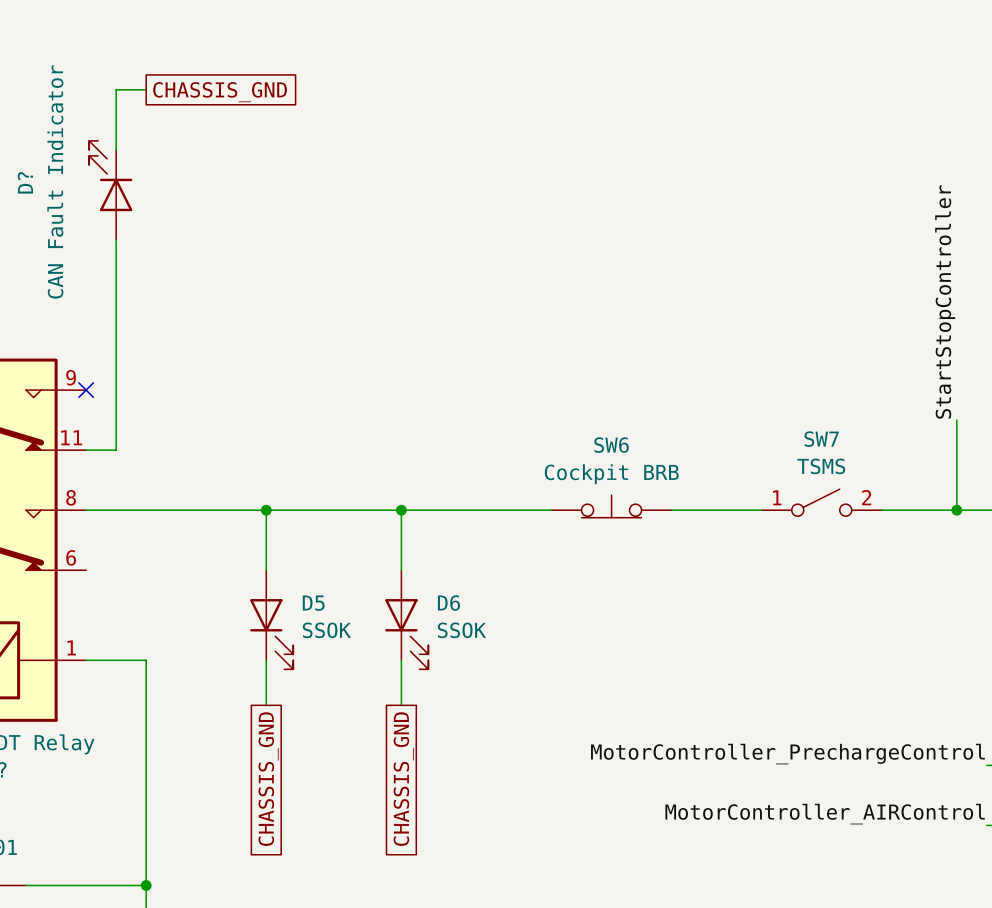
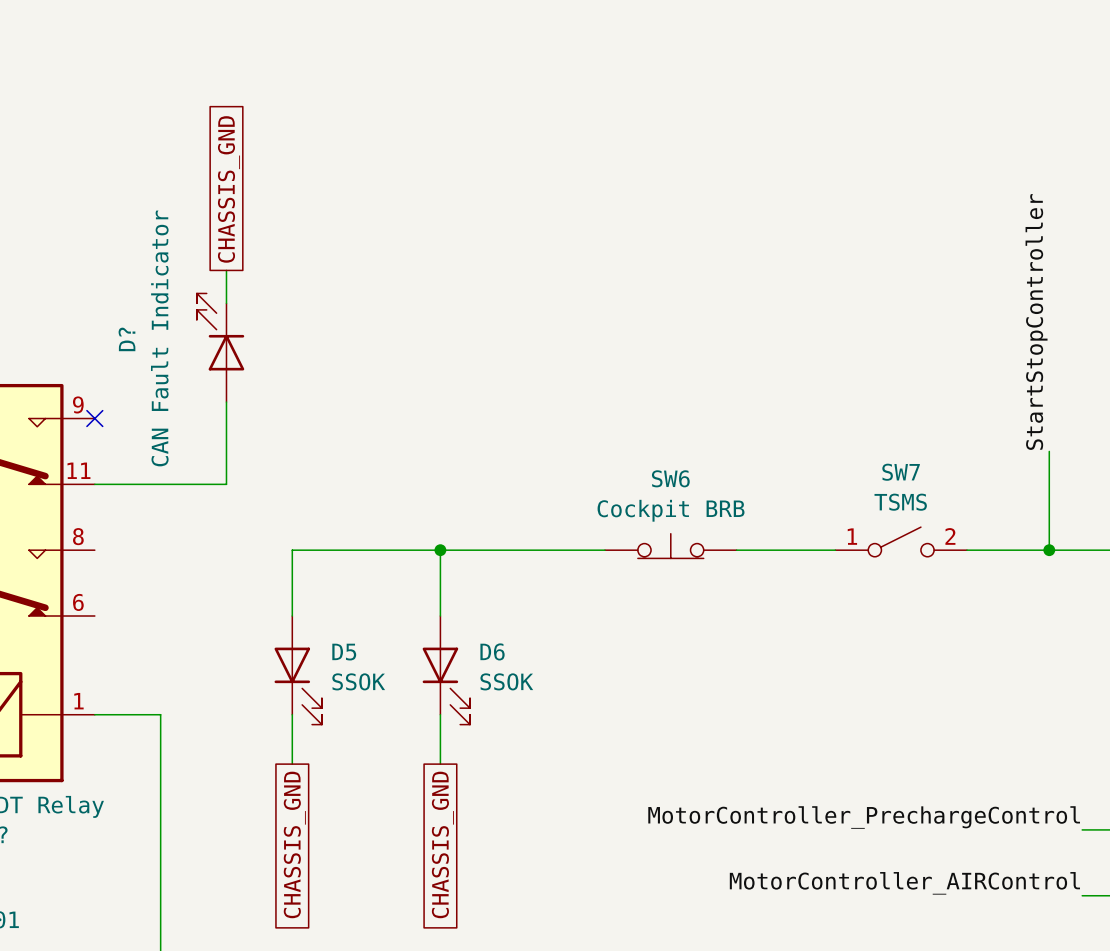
wire: (146, 89) (116, 89) (116, 149) -> none
global label rotation: 0° (220, 92) -> 90° counterclockwise (228, 189)
D? position: (110, 190) -> (220, 347)
wire: (116, 239) (116, 450) -> (226, 402) (226, 484) (127, 484)
wire: none -> (226, 270) (226, 303)
wire: (86, 510) (266, 510) -> none
junction: (266, 510) -> none

